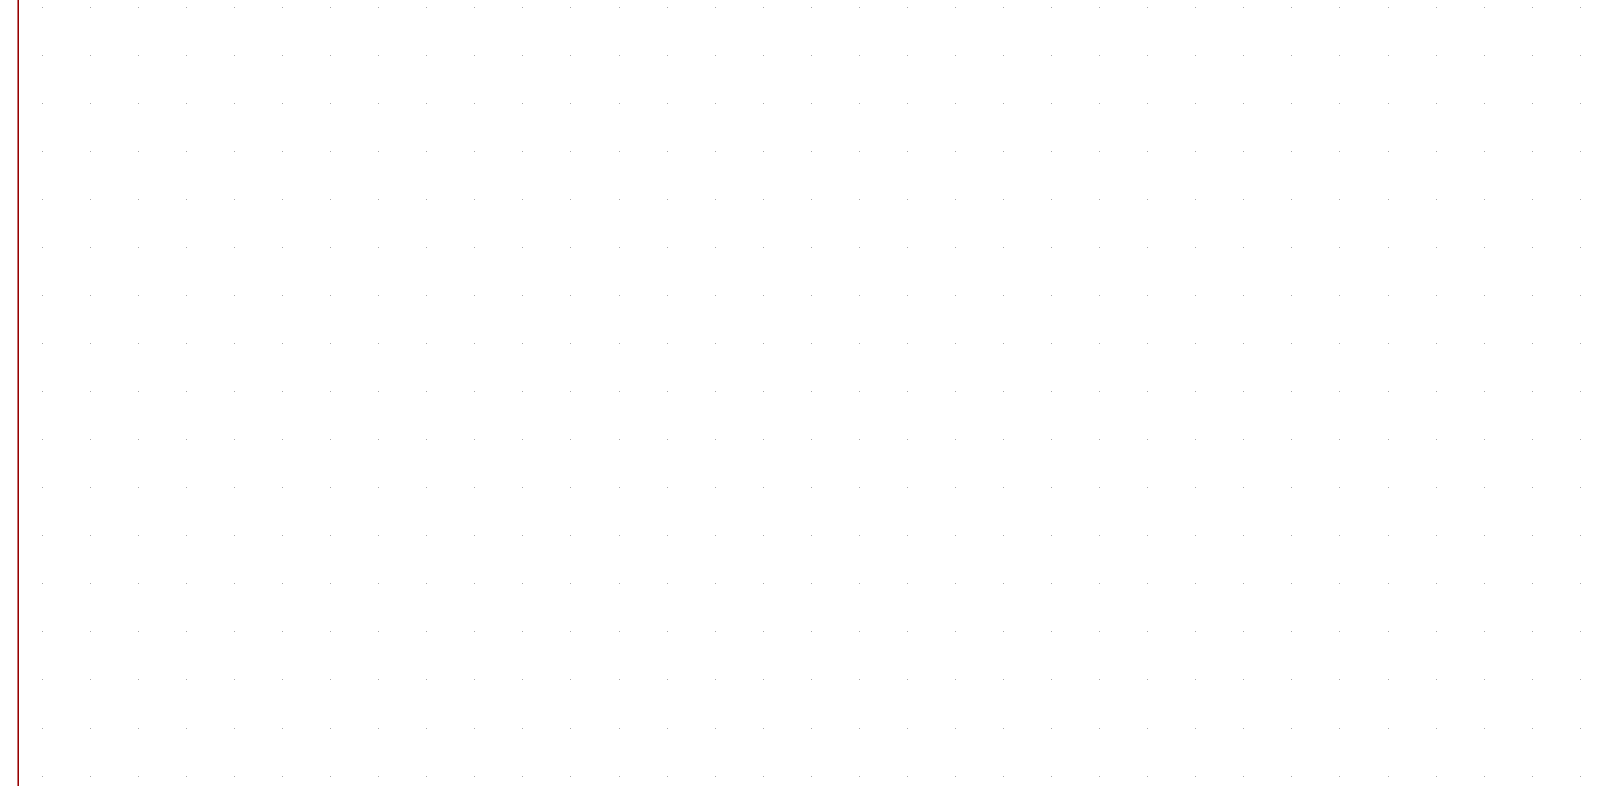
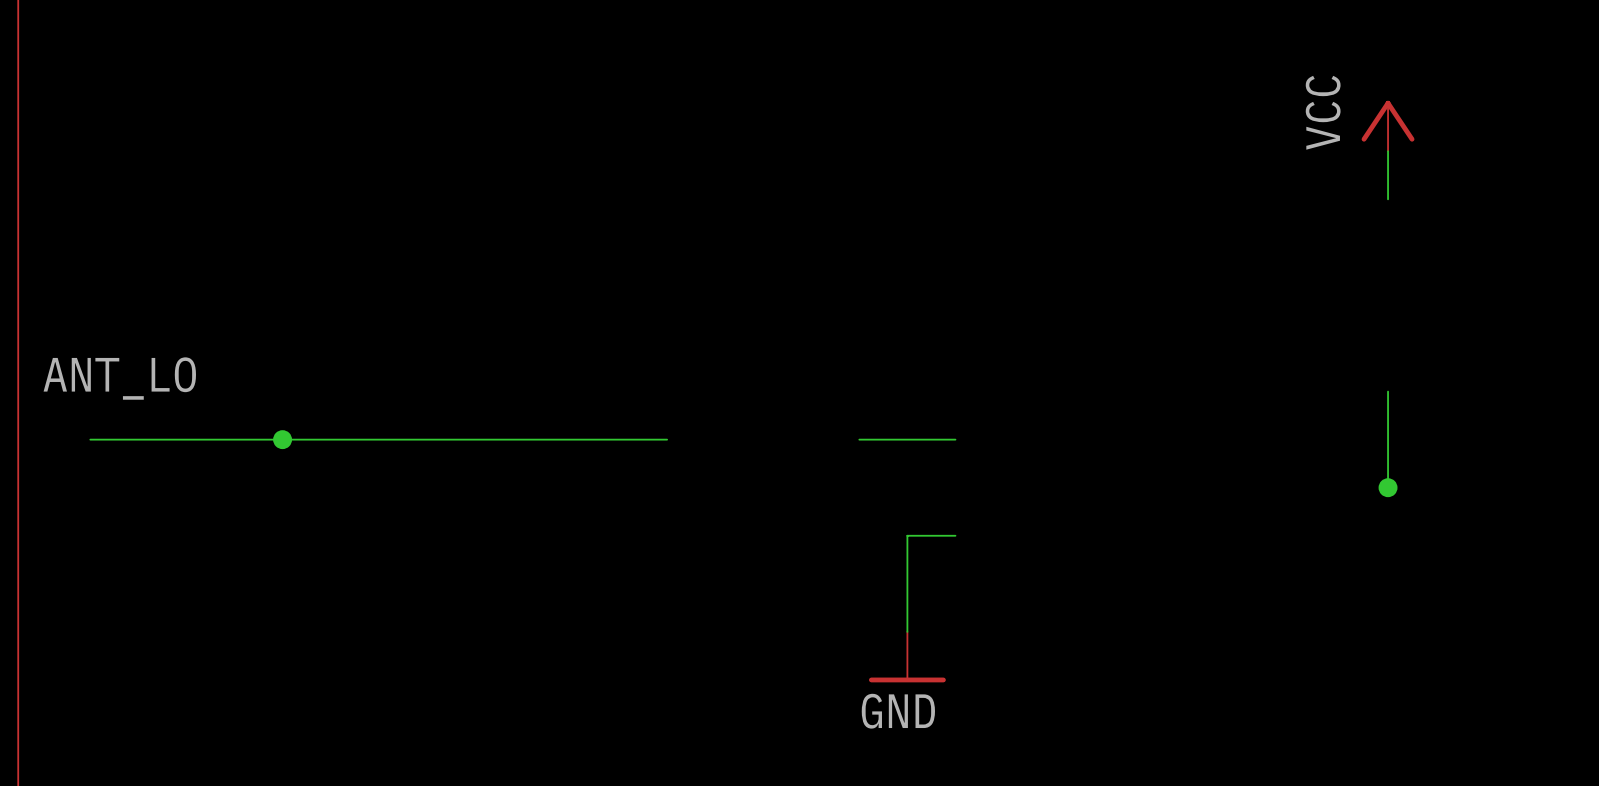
power symbol: none -> VCC (1388, 126)
wire: none -> (1388, 151) (1388, 199)
label: none -> ANT_LO (119, 378)
wire: none -> (1388, 391) (1388, 487)
wire: none -> (90, 439) (667, 439)
junction: none -> (282, 439)
wire: none -> (859, 439) (955, 439)
junction: none -> (1388, 487)
wire: none -> (955, 535) (907, 535) (907, 631)
power symbol: none -> GND (907, 657)

